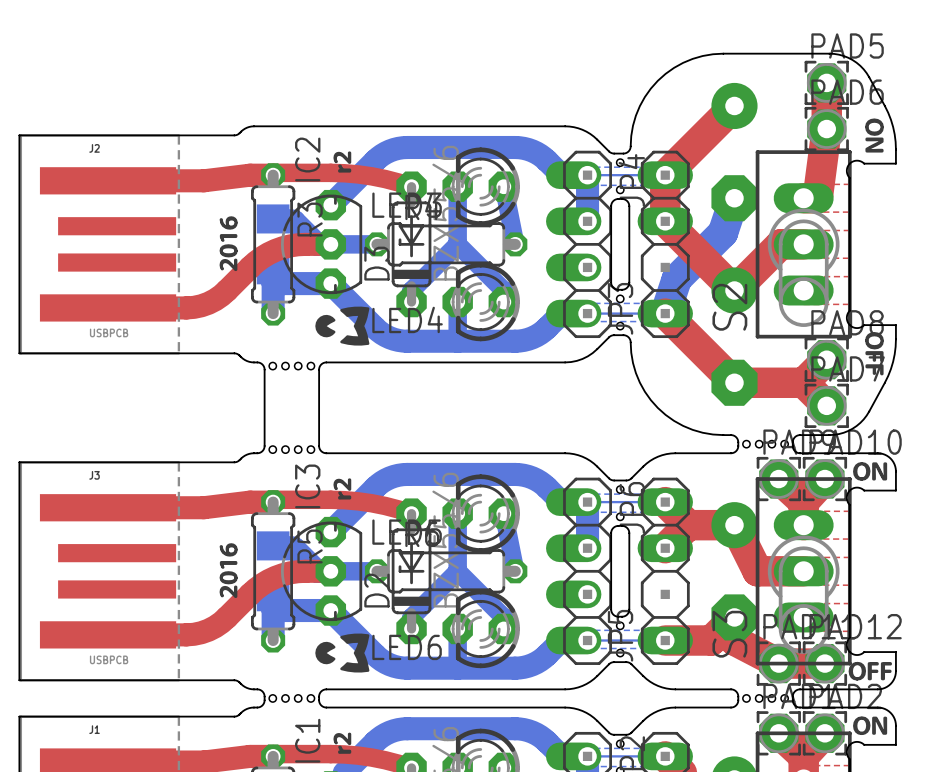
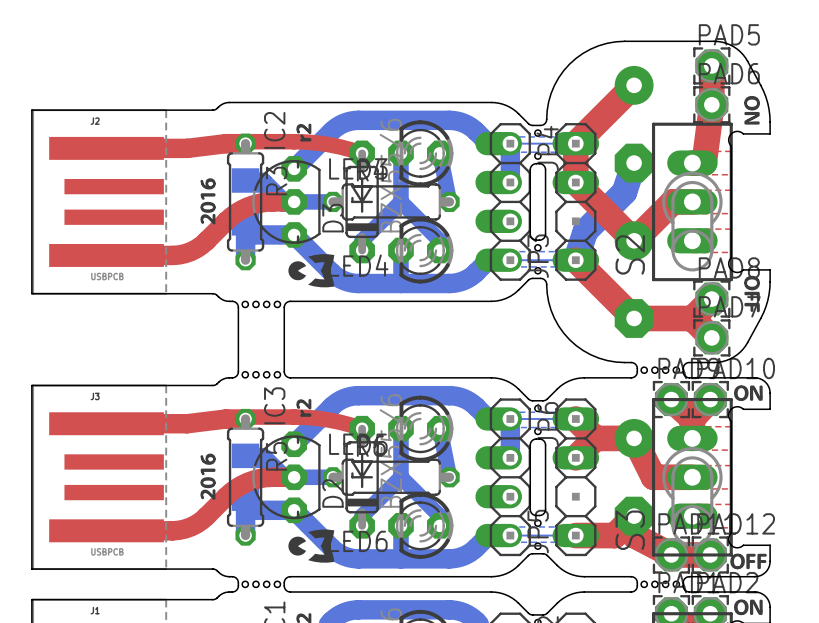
drawing shape: [315, 306, 370, 346] -> [288, 254, 335, 288]
drawing shape: [315, 633, 370, 673] -> [288, 529, 335, 563]

